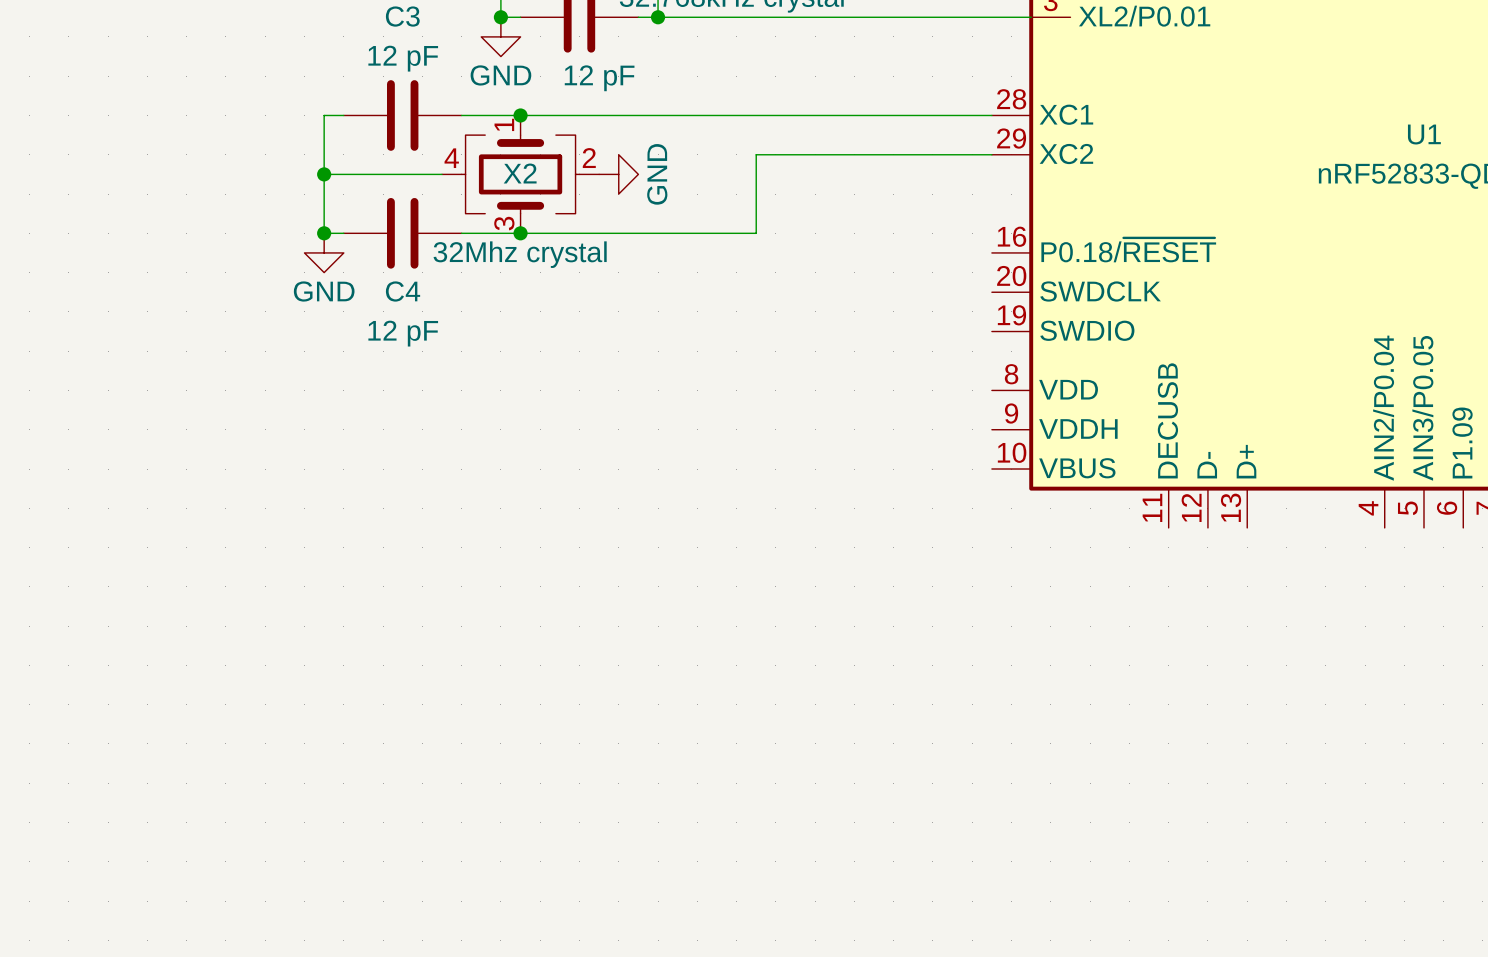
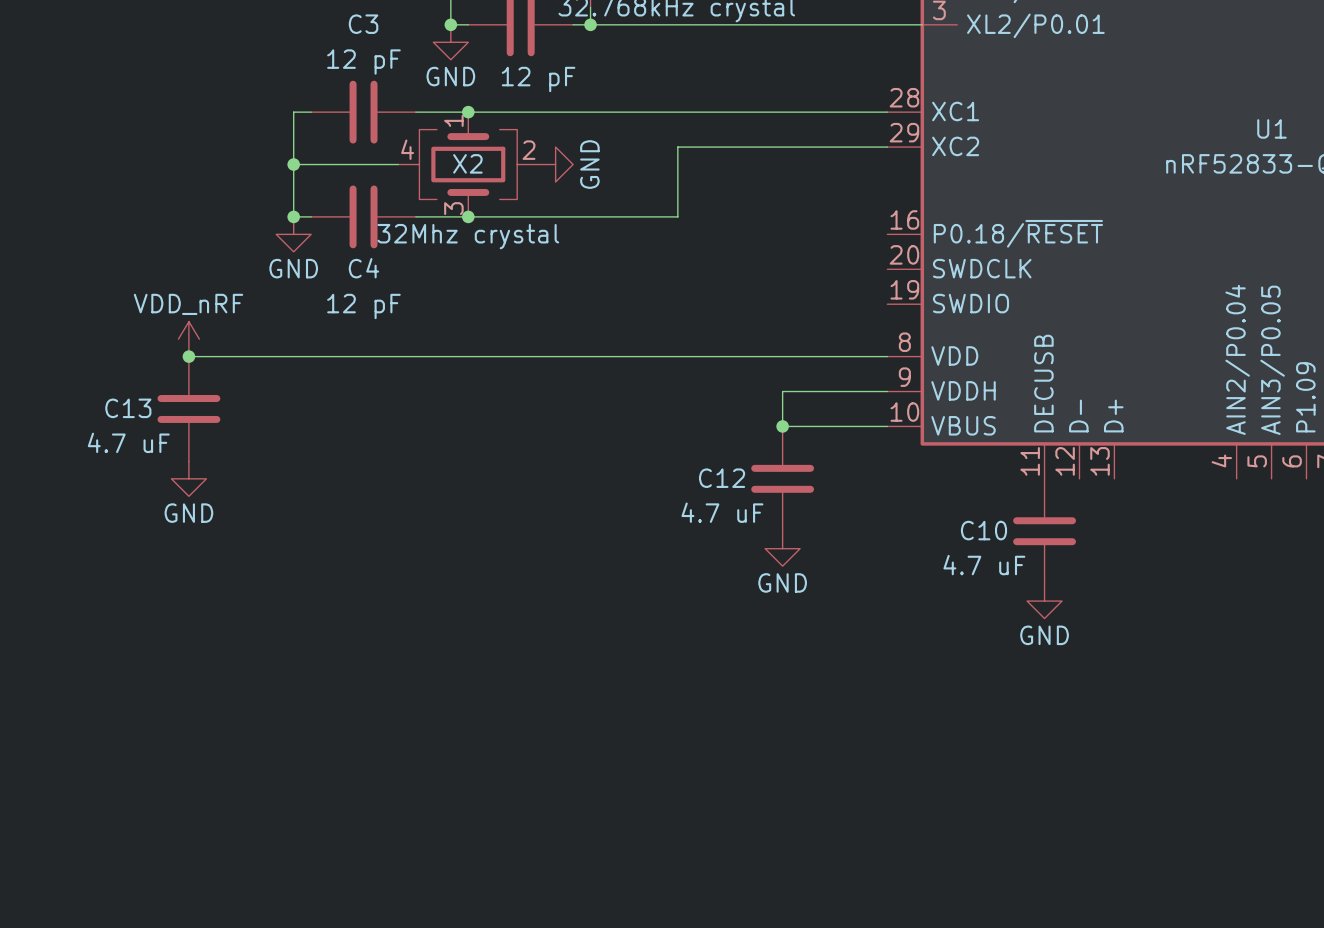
power symbol: none -> VDD_nRF (188, 339)
wire: none -> (188, 356) (887, 356)
junction: none -> (188, 356)
wire: none -> (887, 391) (782, 391) (782, 426) (887, 426)
C13: none -> 4.7 uF (188, 408)
junction: none -> (782, 426)
power symbol: none -> GND (188, 478)
C12: none -> 4.7 uF (782, 478)
C10: none -> 4.7 uF (1044, 531)
power symbol: none -> GND (782, 548)
power symbol: none -> GND (1044, 601)

